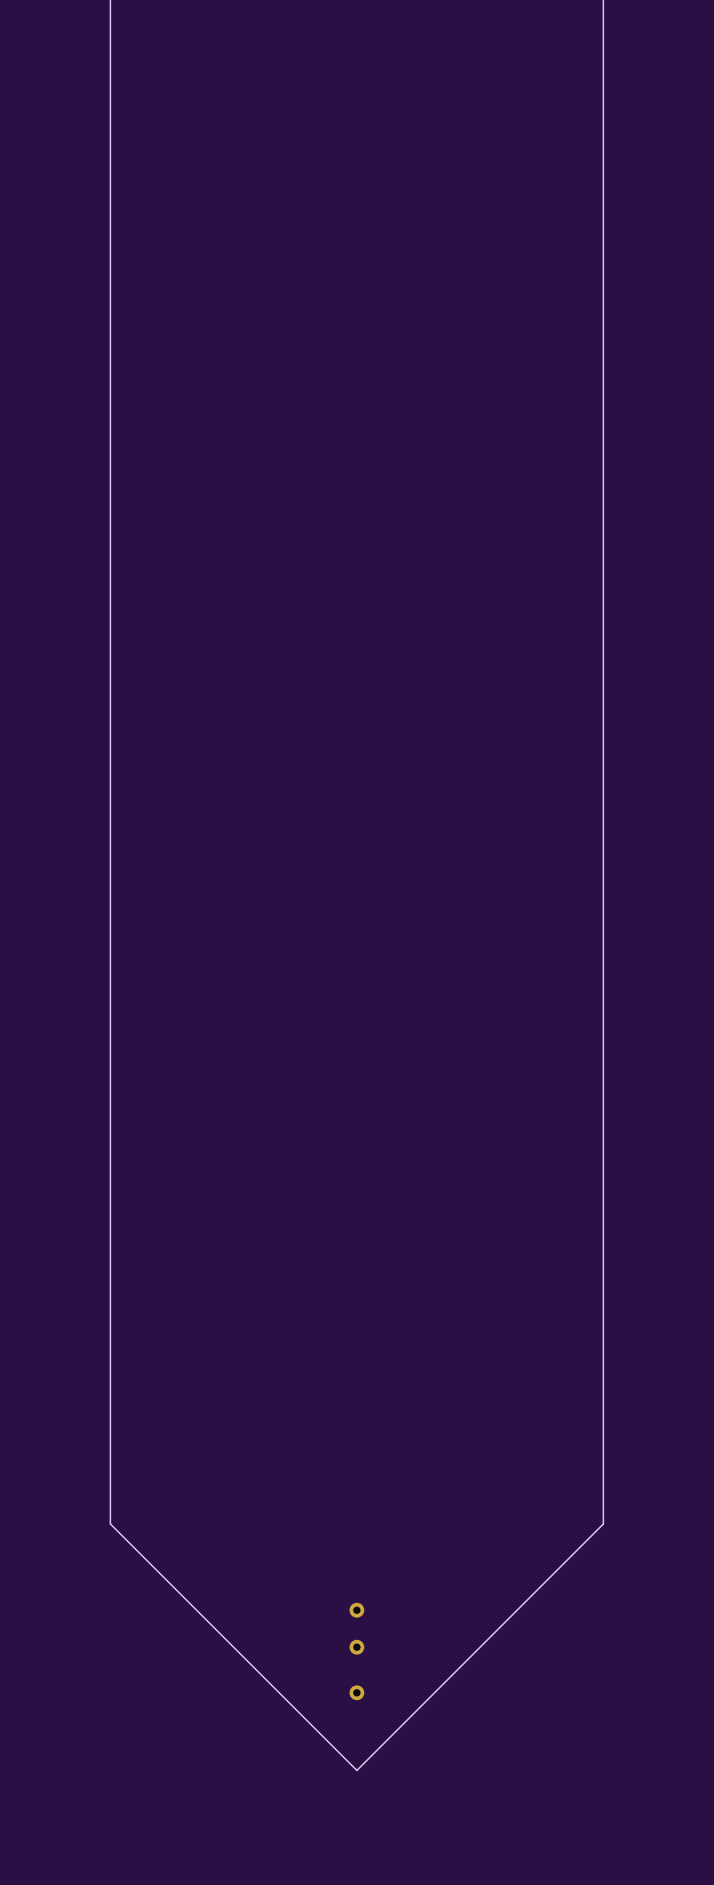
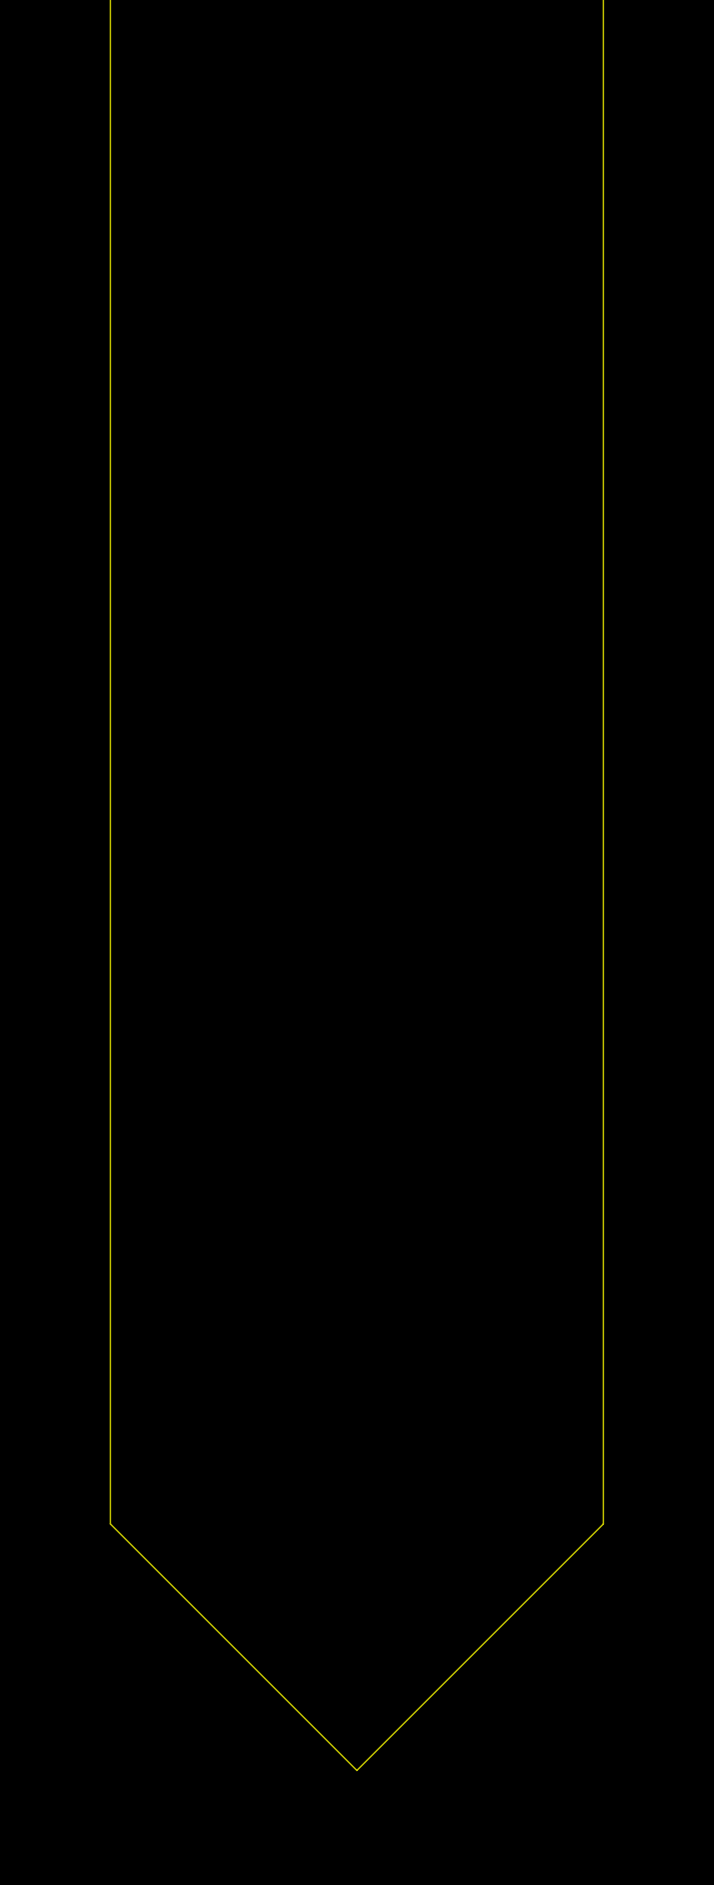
via: (356, 1610) -> none
via: (356, 1647) -> none
via: (356, 1692) -> none

